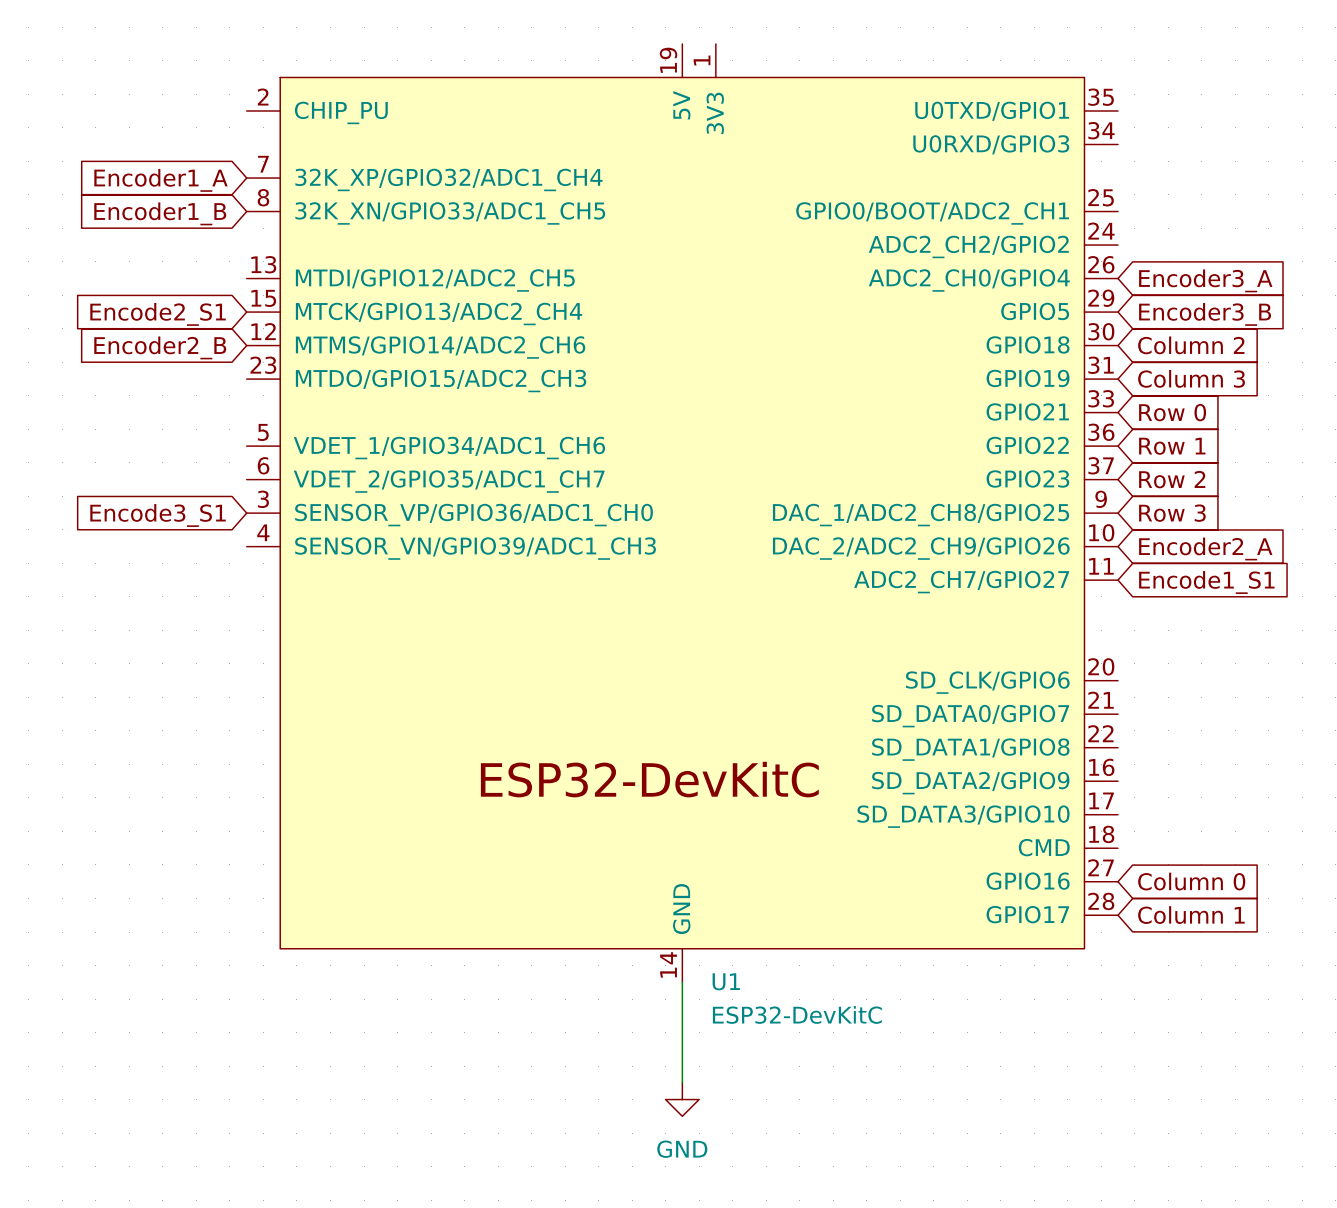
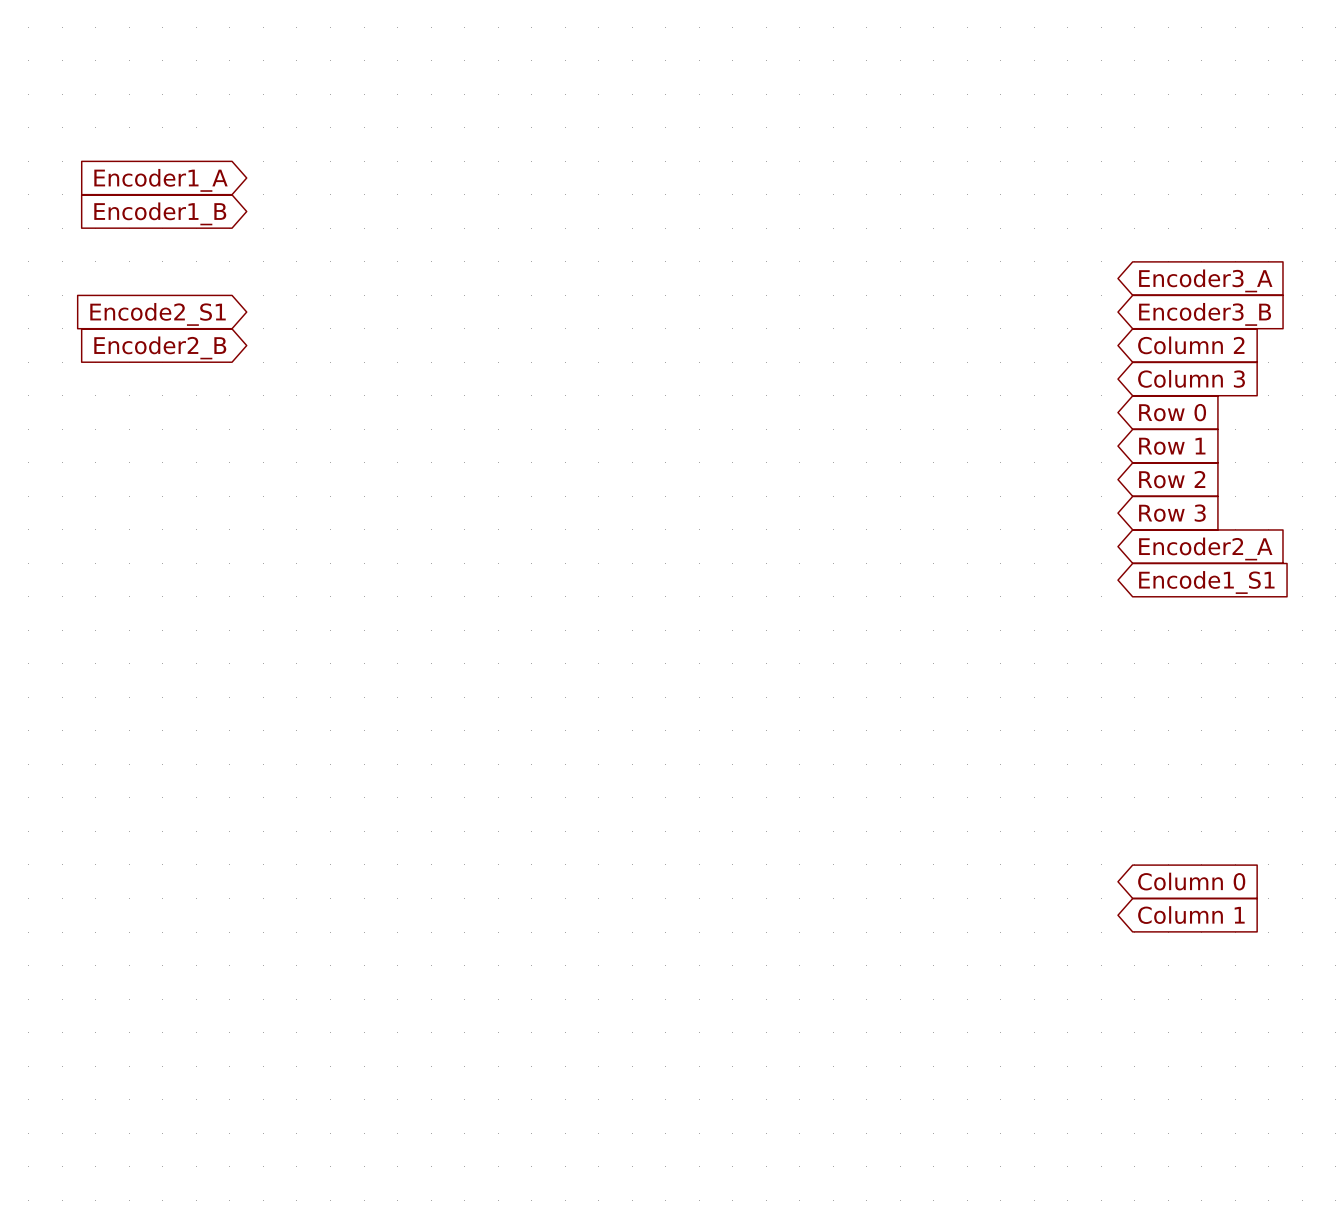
U1: ESP32-DevKitC (682, 513) -> none
global label: Encode3_S1 (158, 515) -> none
wire: (682, 982) (682, 1082) -> none
power symbol: GND (682, 1099) -> none

